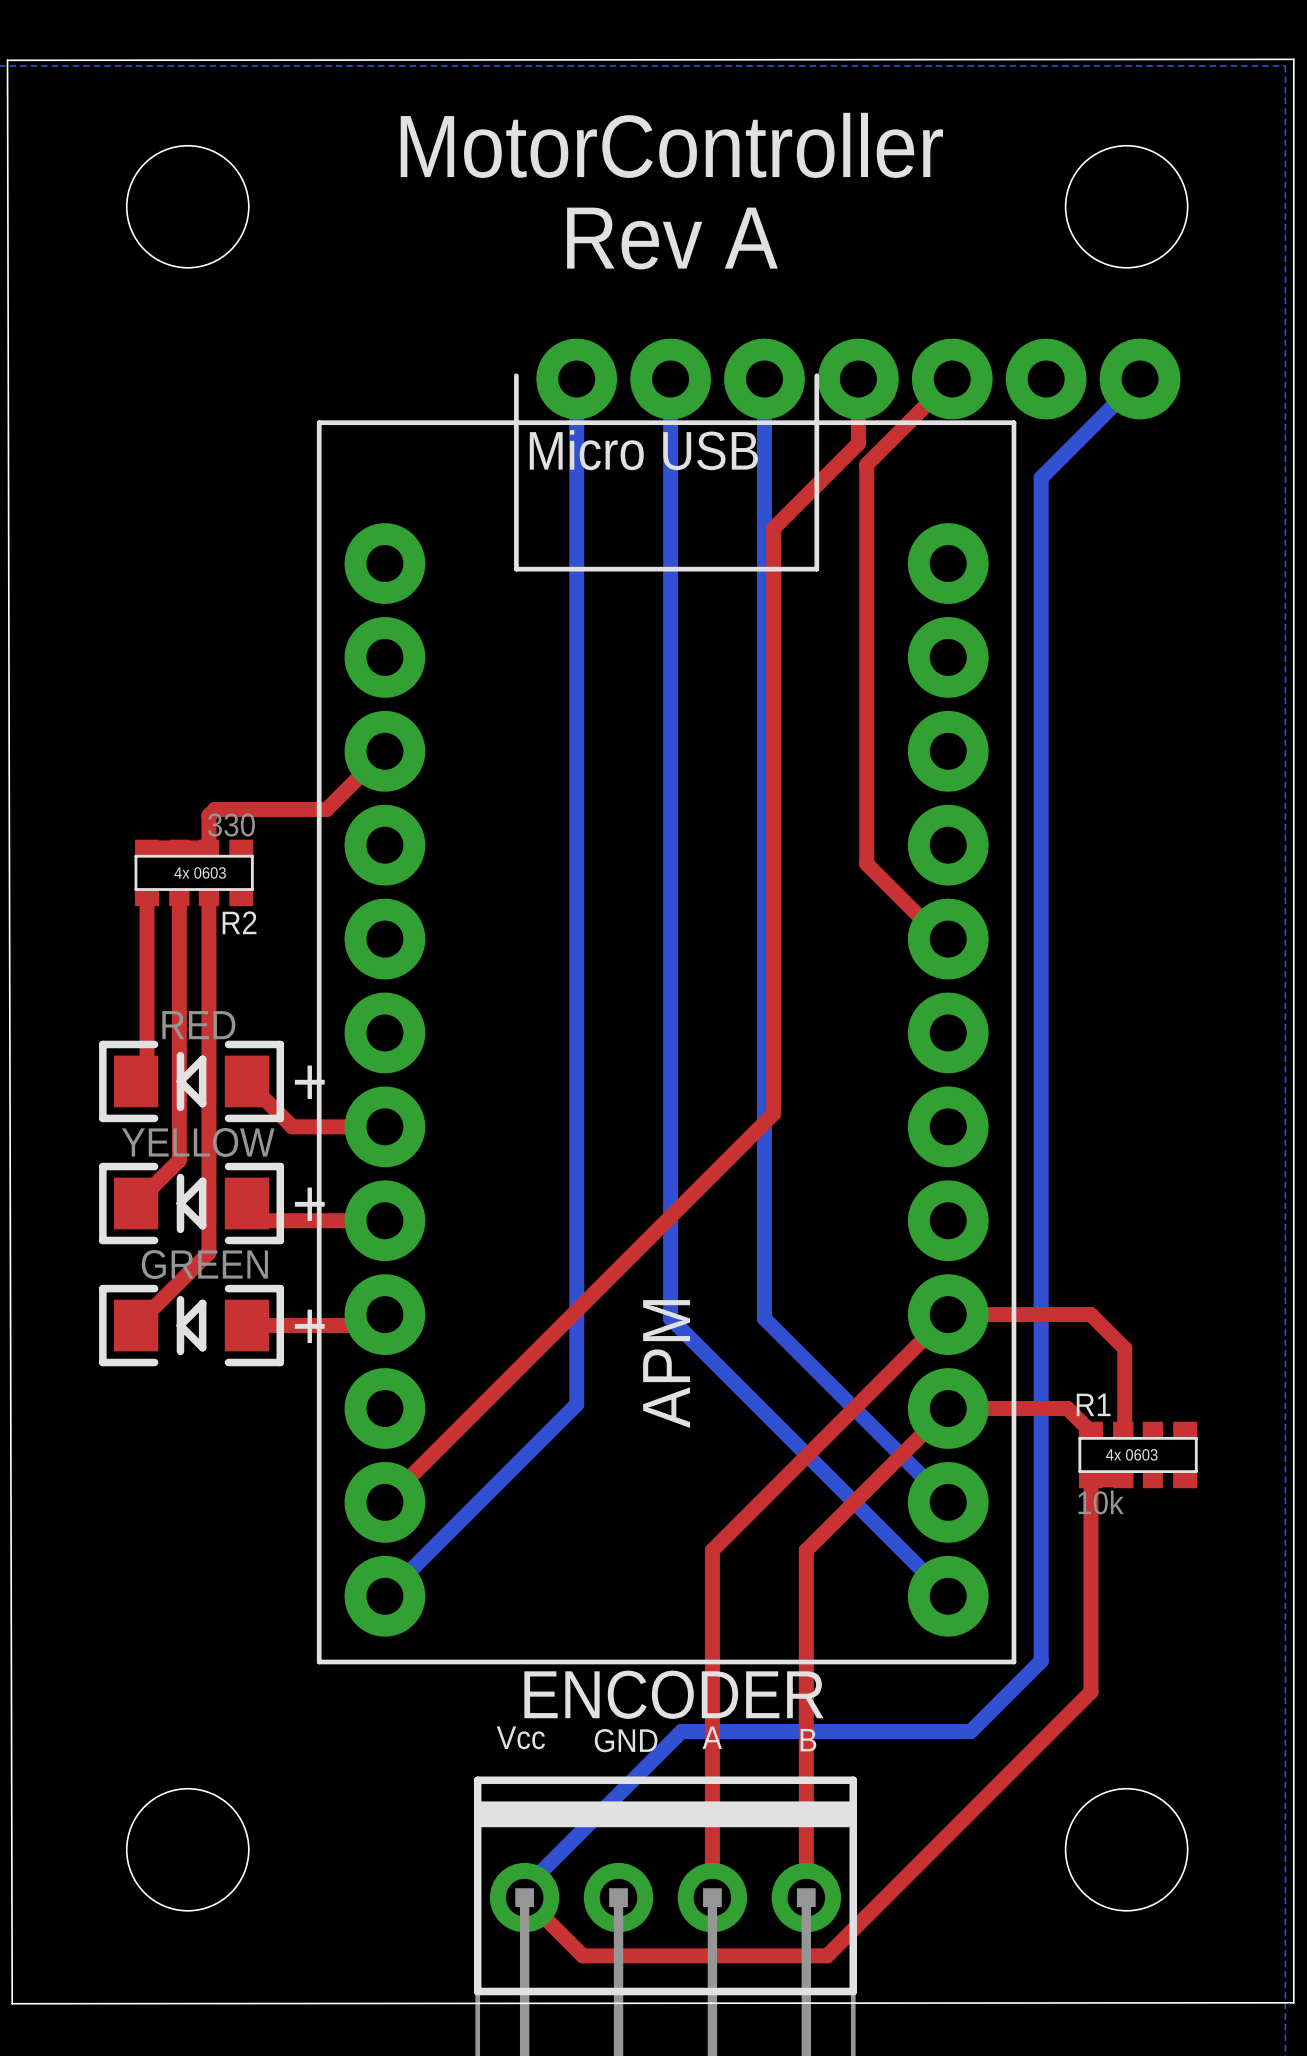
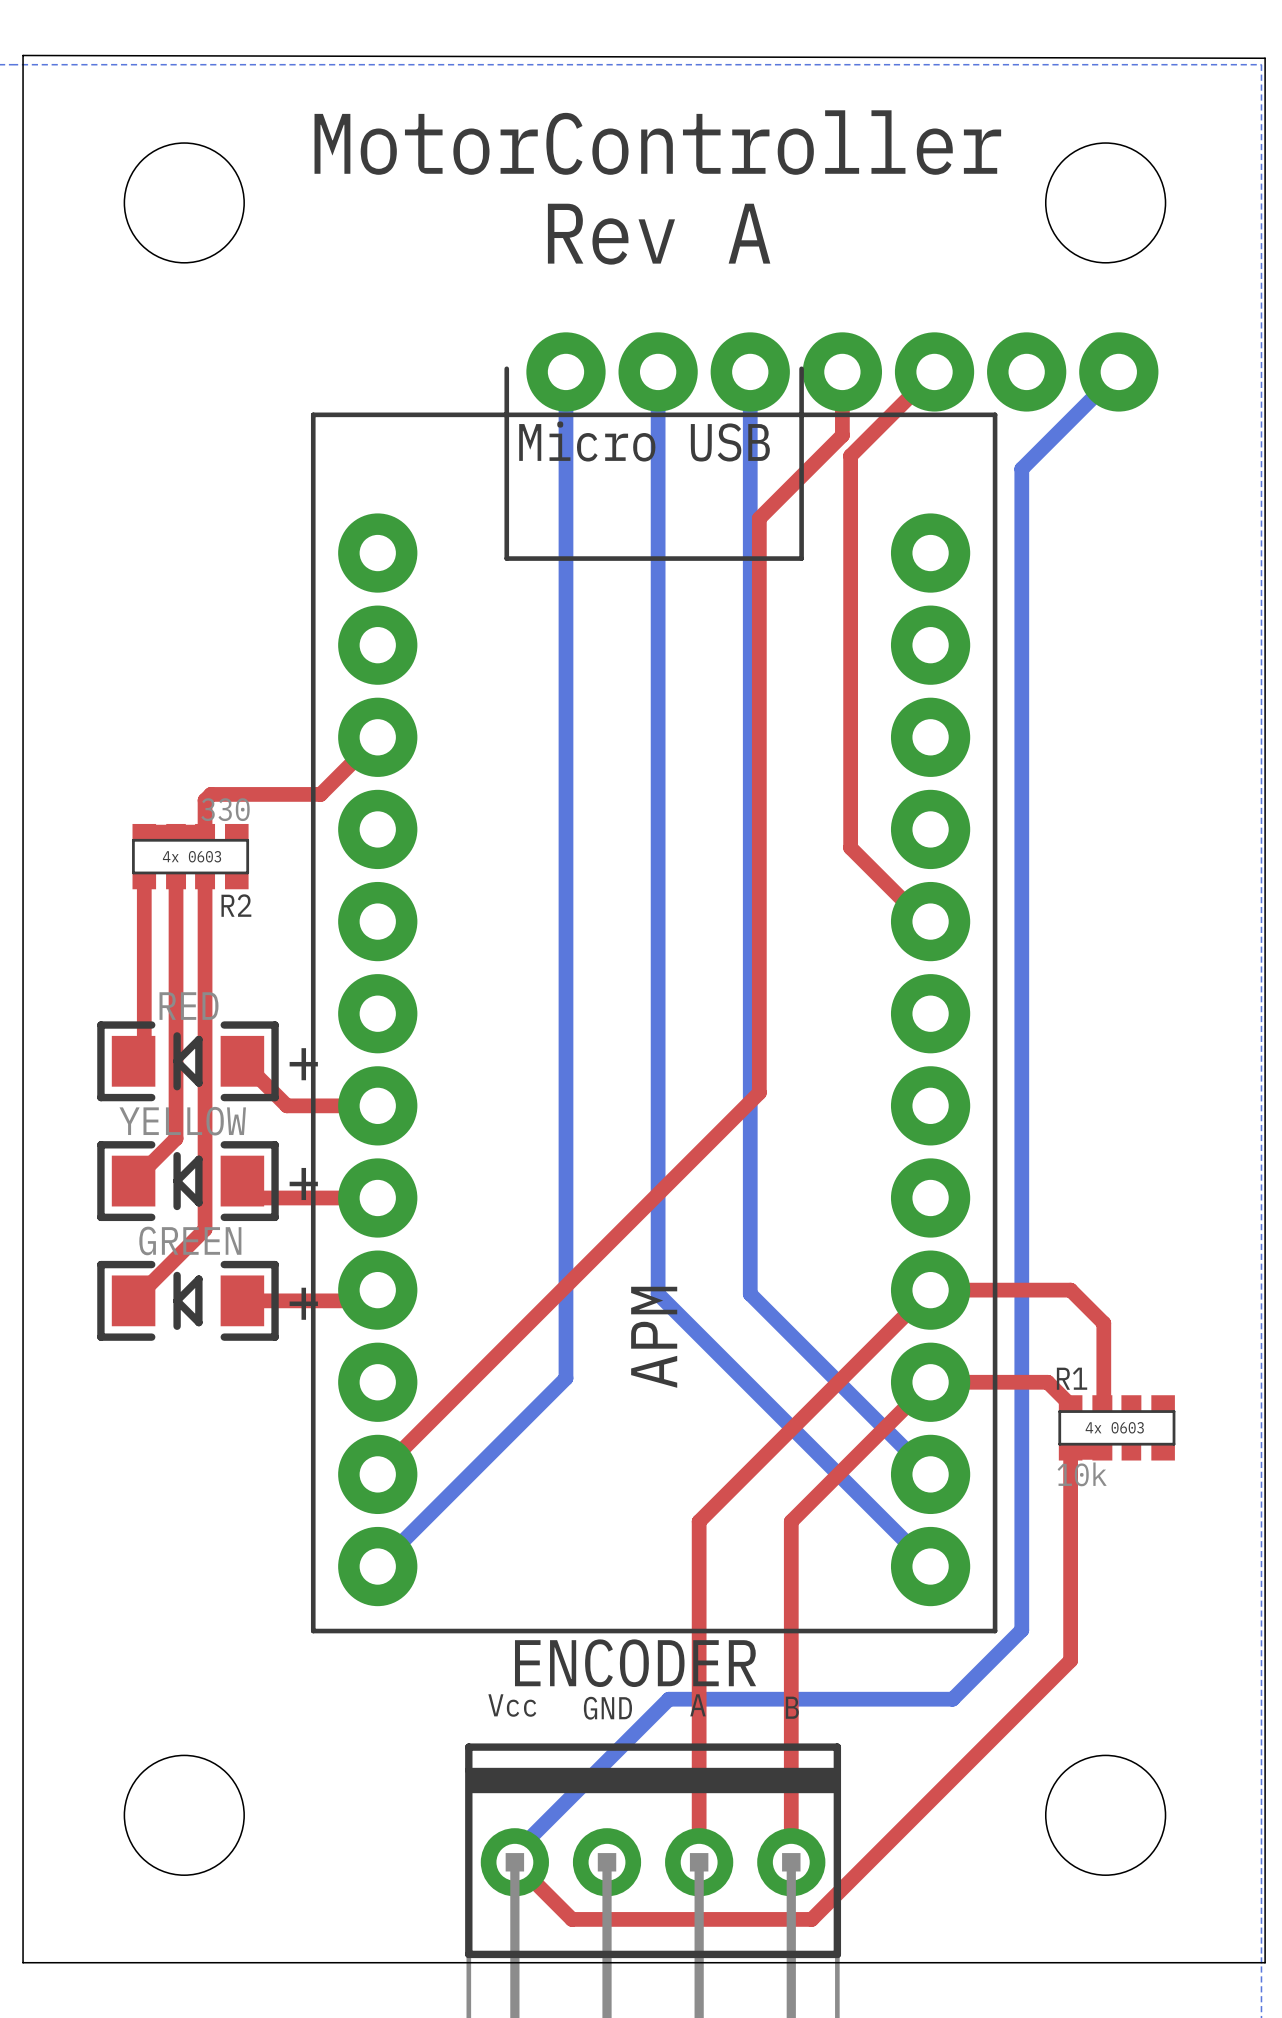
board edge: (1293, 59) (1293, 2002) (12, 2003) (7, 60) (1293, 59) -> (23, 55) (23, 1962) (1265, 1962) (1265, 58) (23, 55)

